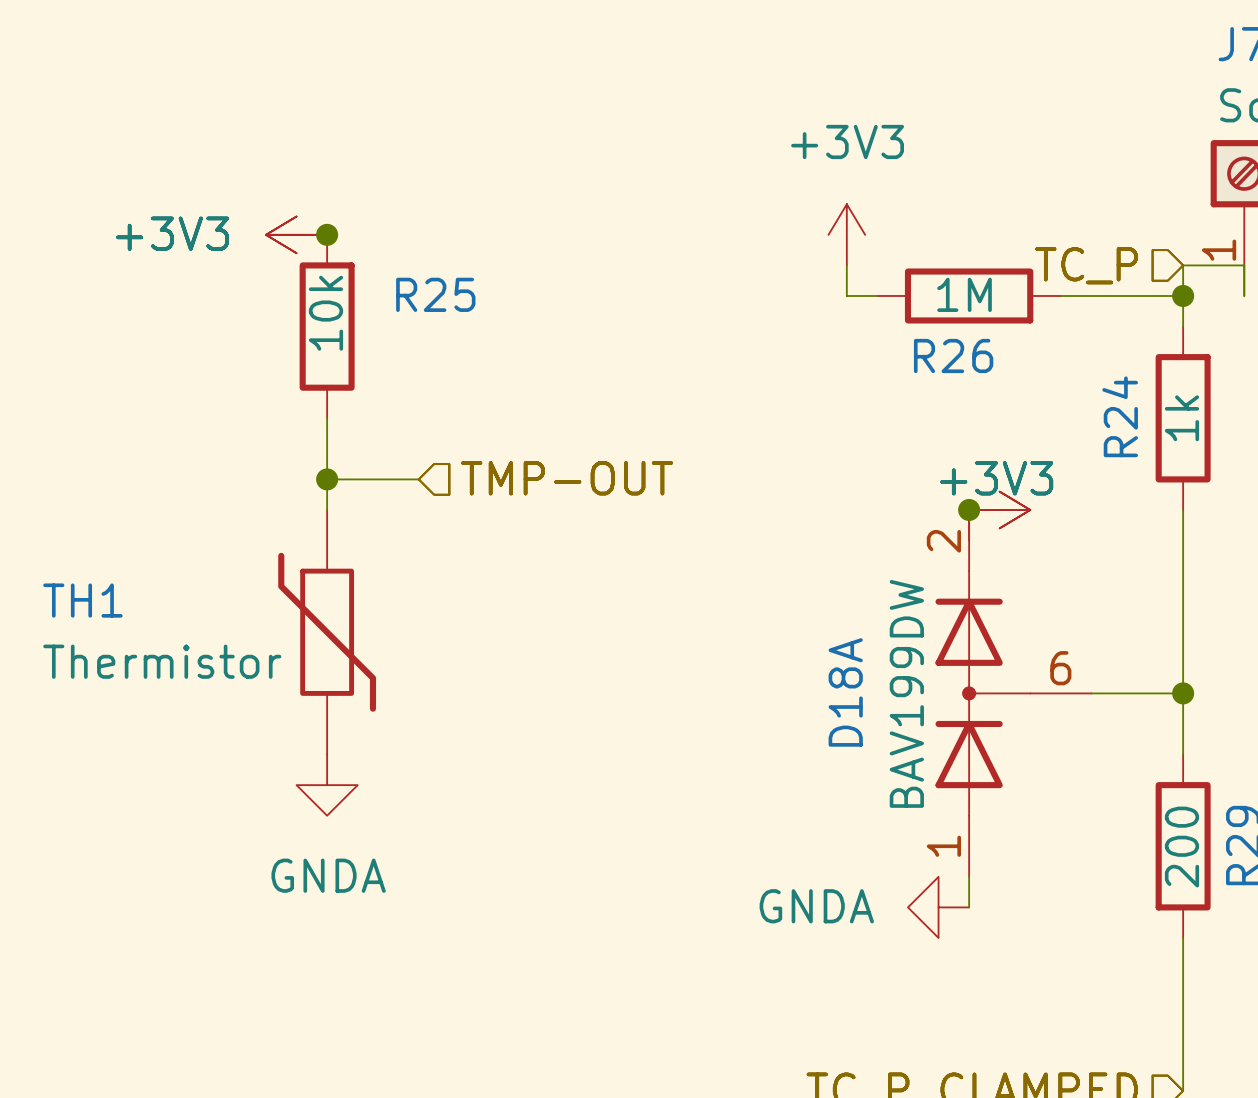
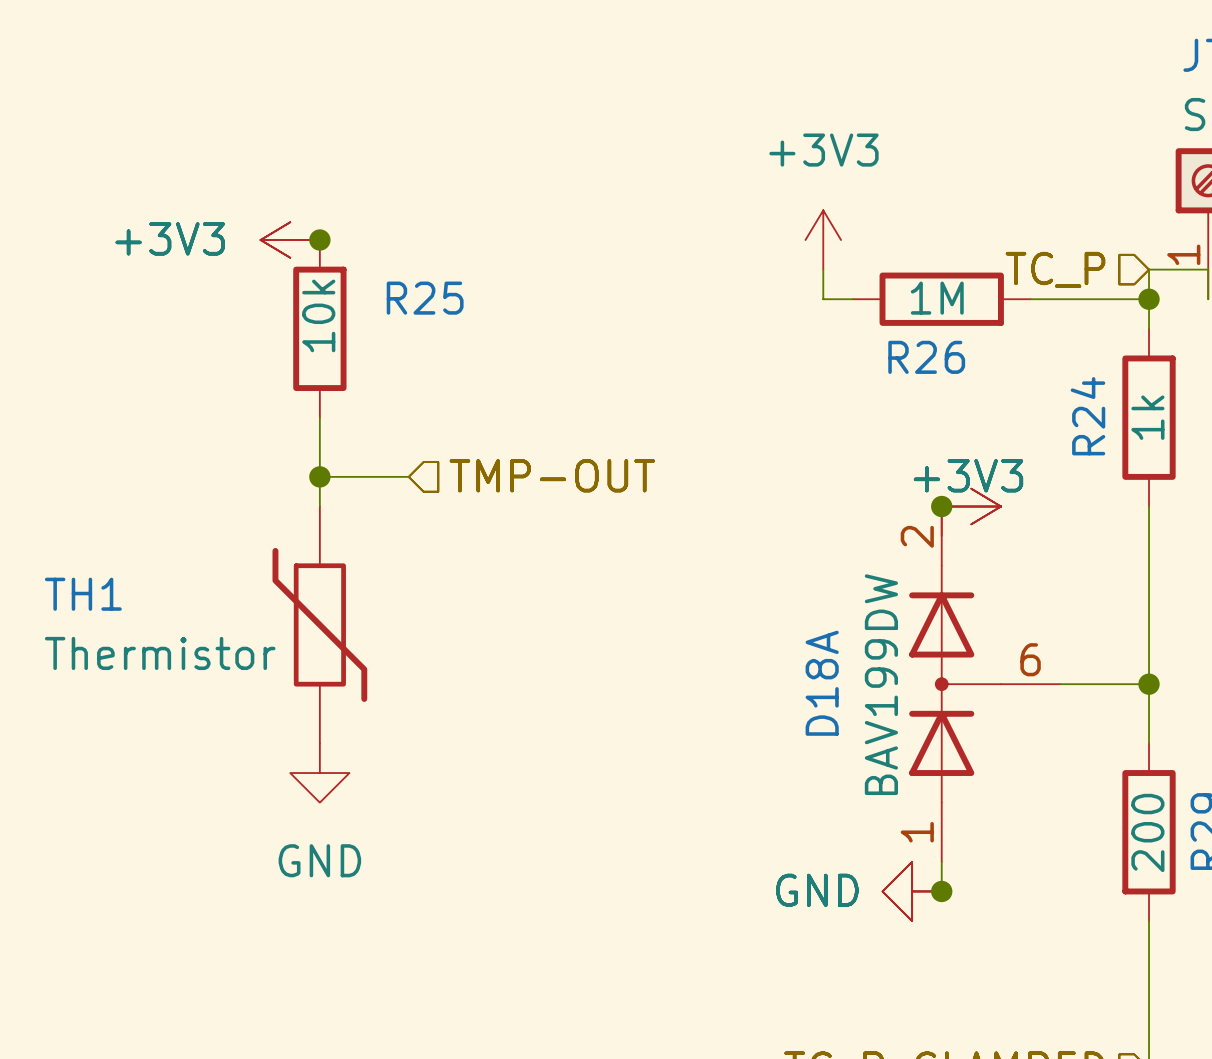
power symbol: GNDA (327, 785) -> GND (319, 773)
power symbol: GNDA (938, 907) -> GND (912, 891)
junction: none -> (941, 891)

